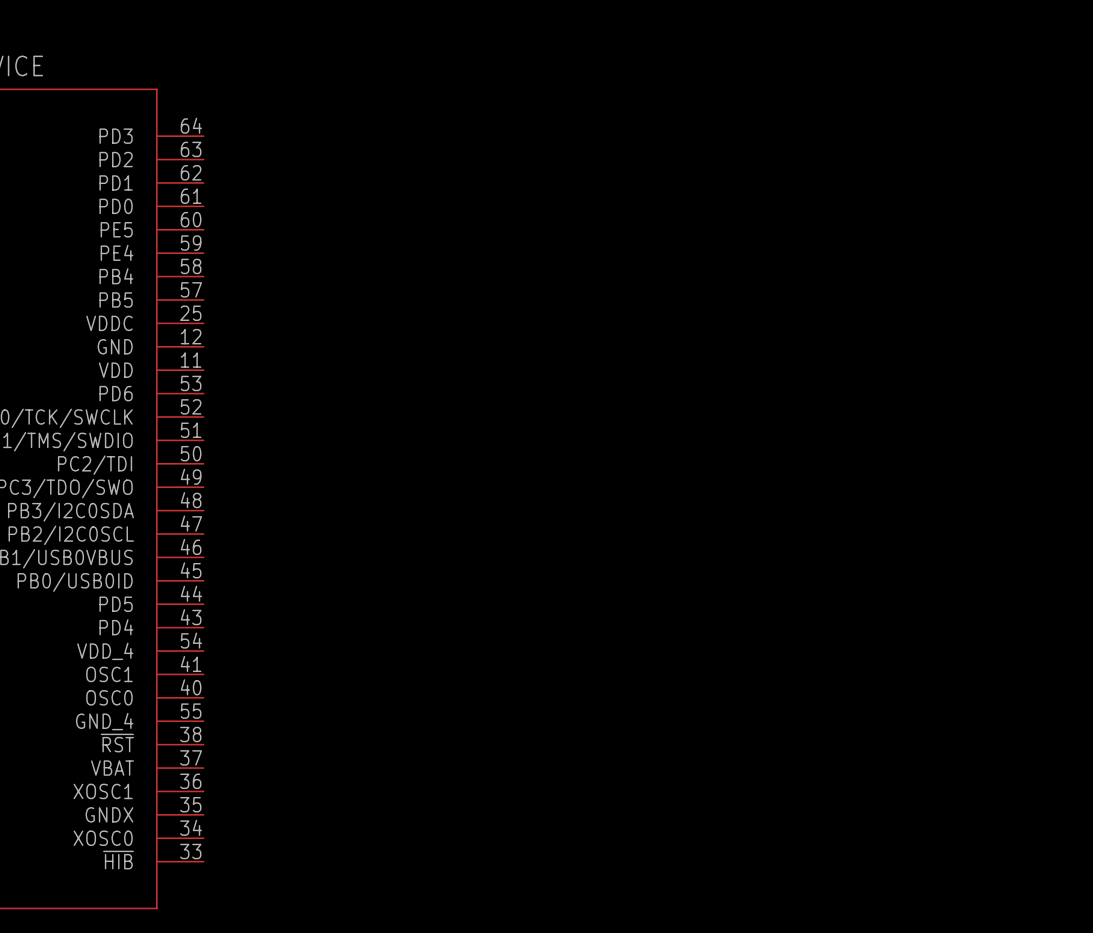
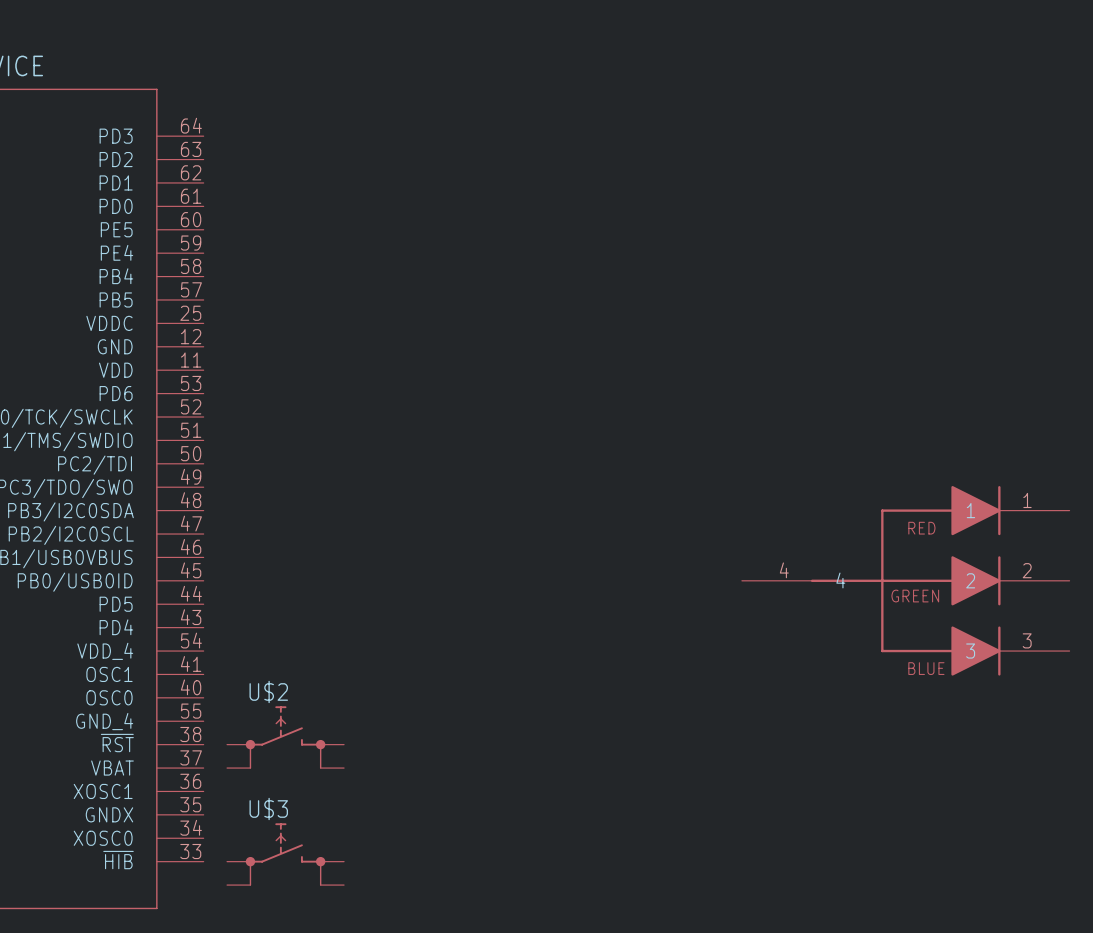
part: none -> (905, 580)
U$2: none -> (285, 737)
U$3: none -> (285, 854)

